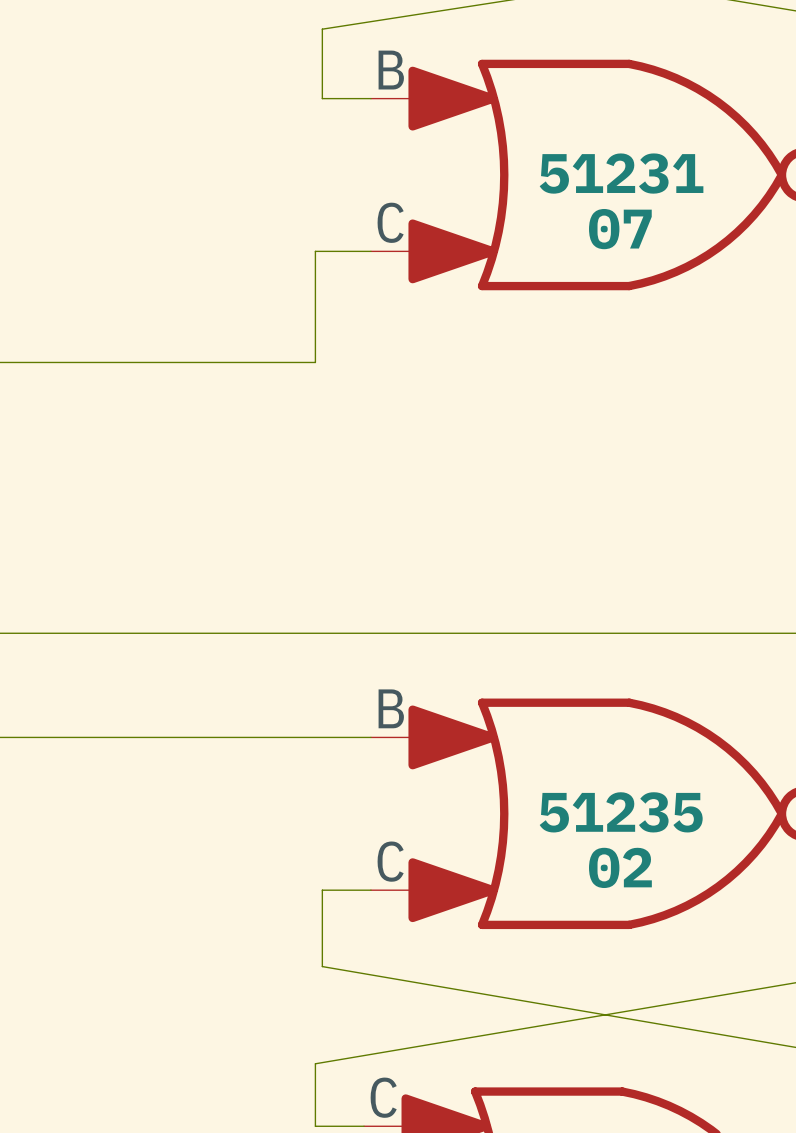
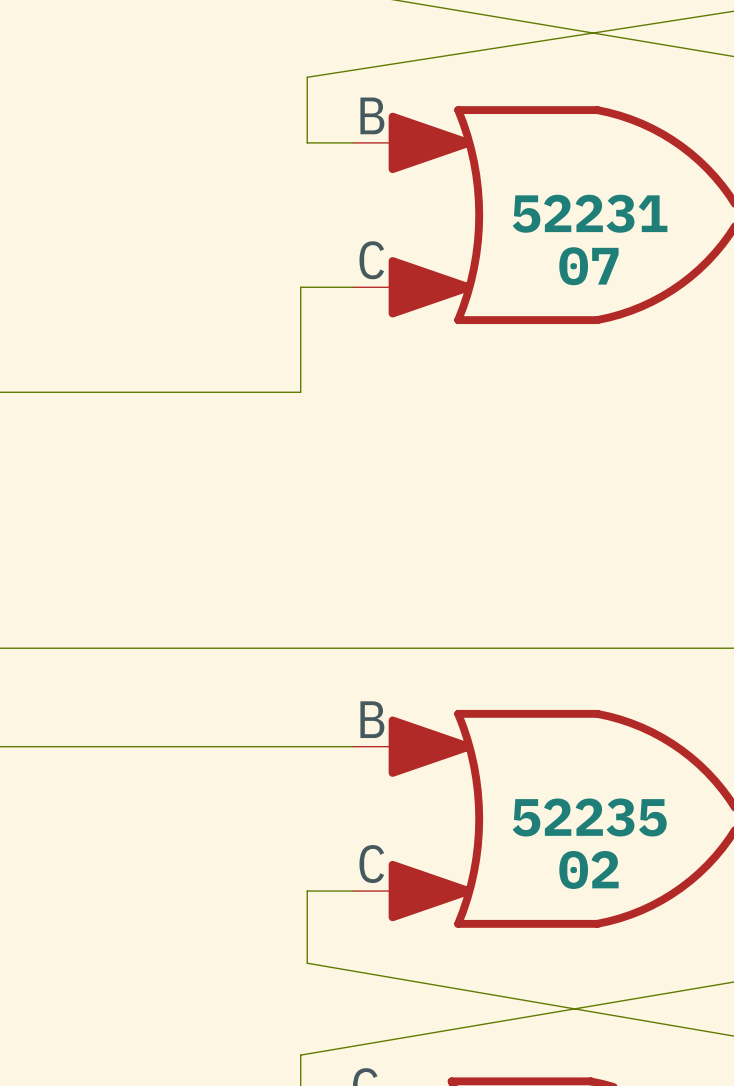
part text: 51231 (621, 173) -> 52231 (590, 213)
part text: 51235 (621, 812) -> 52235 (589, 817)

